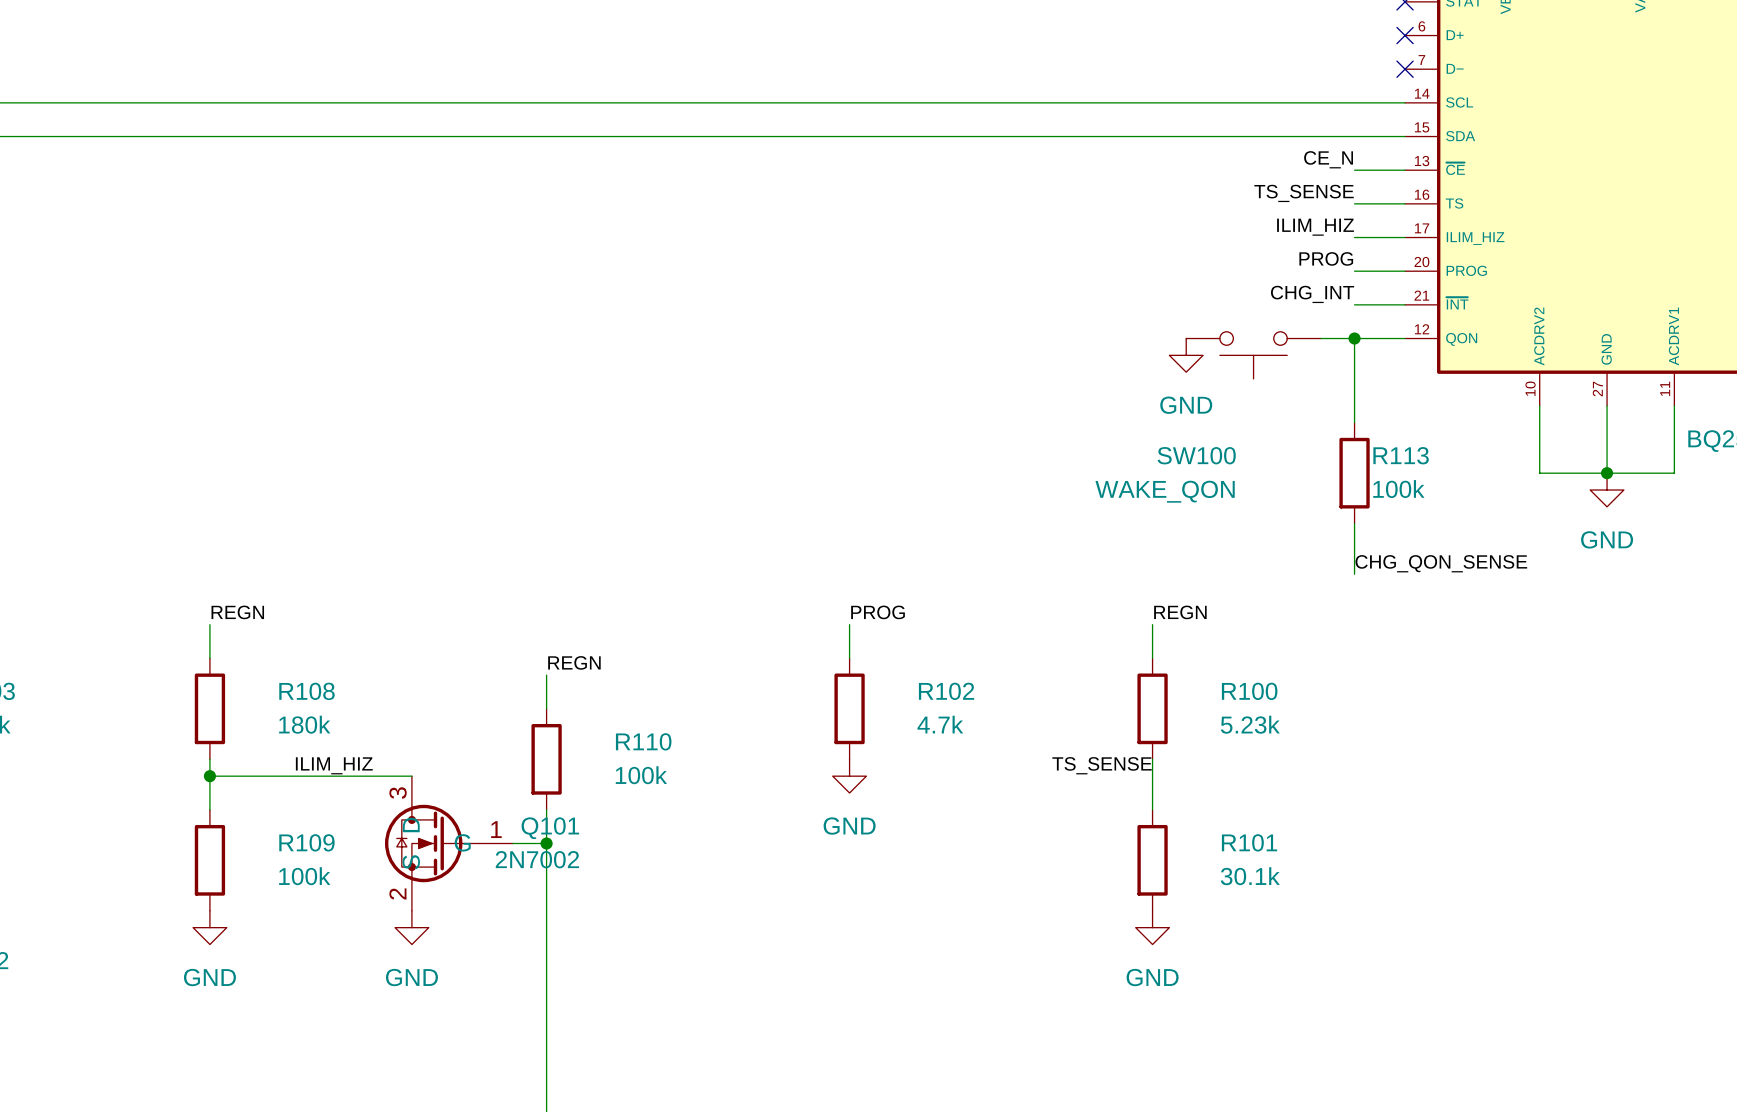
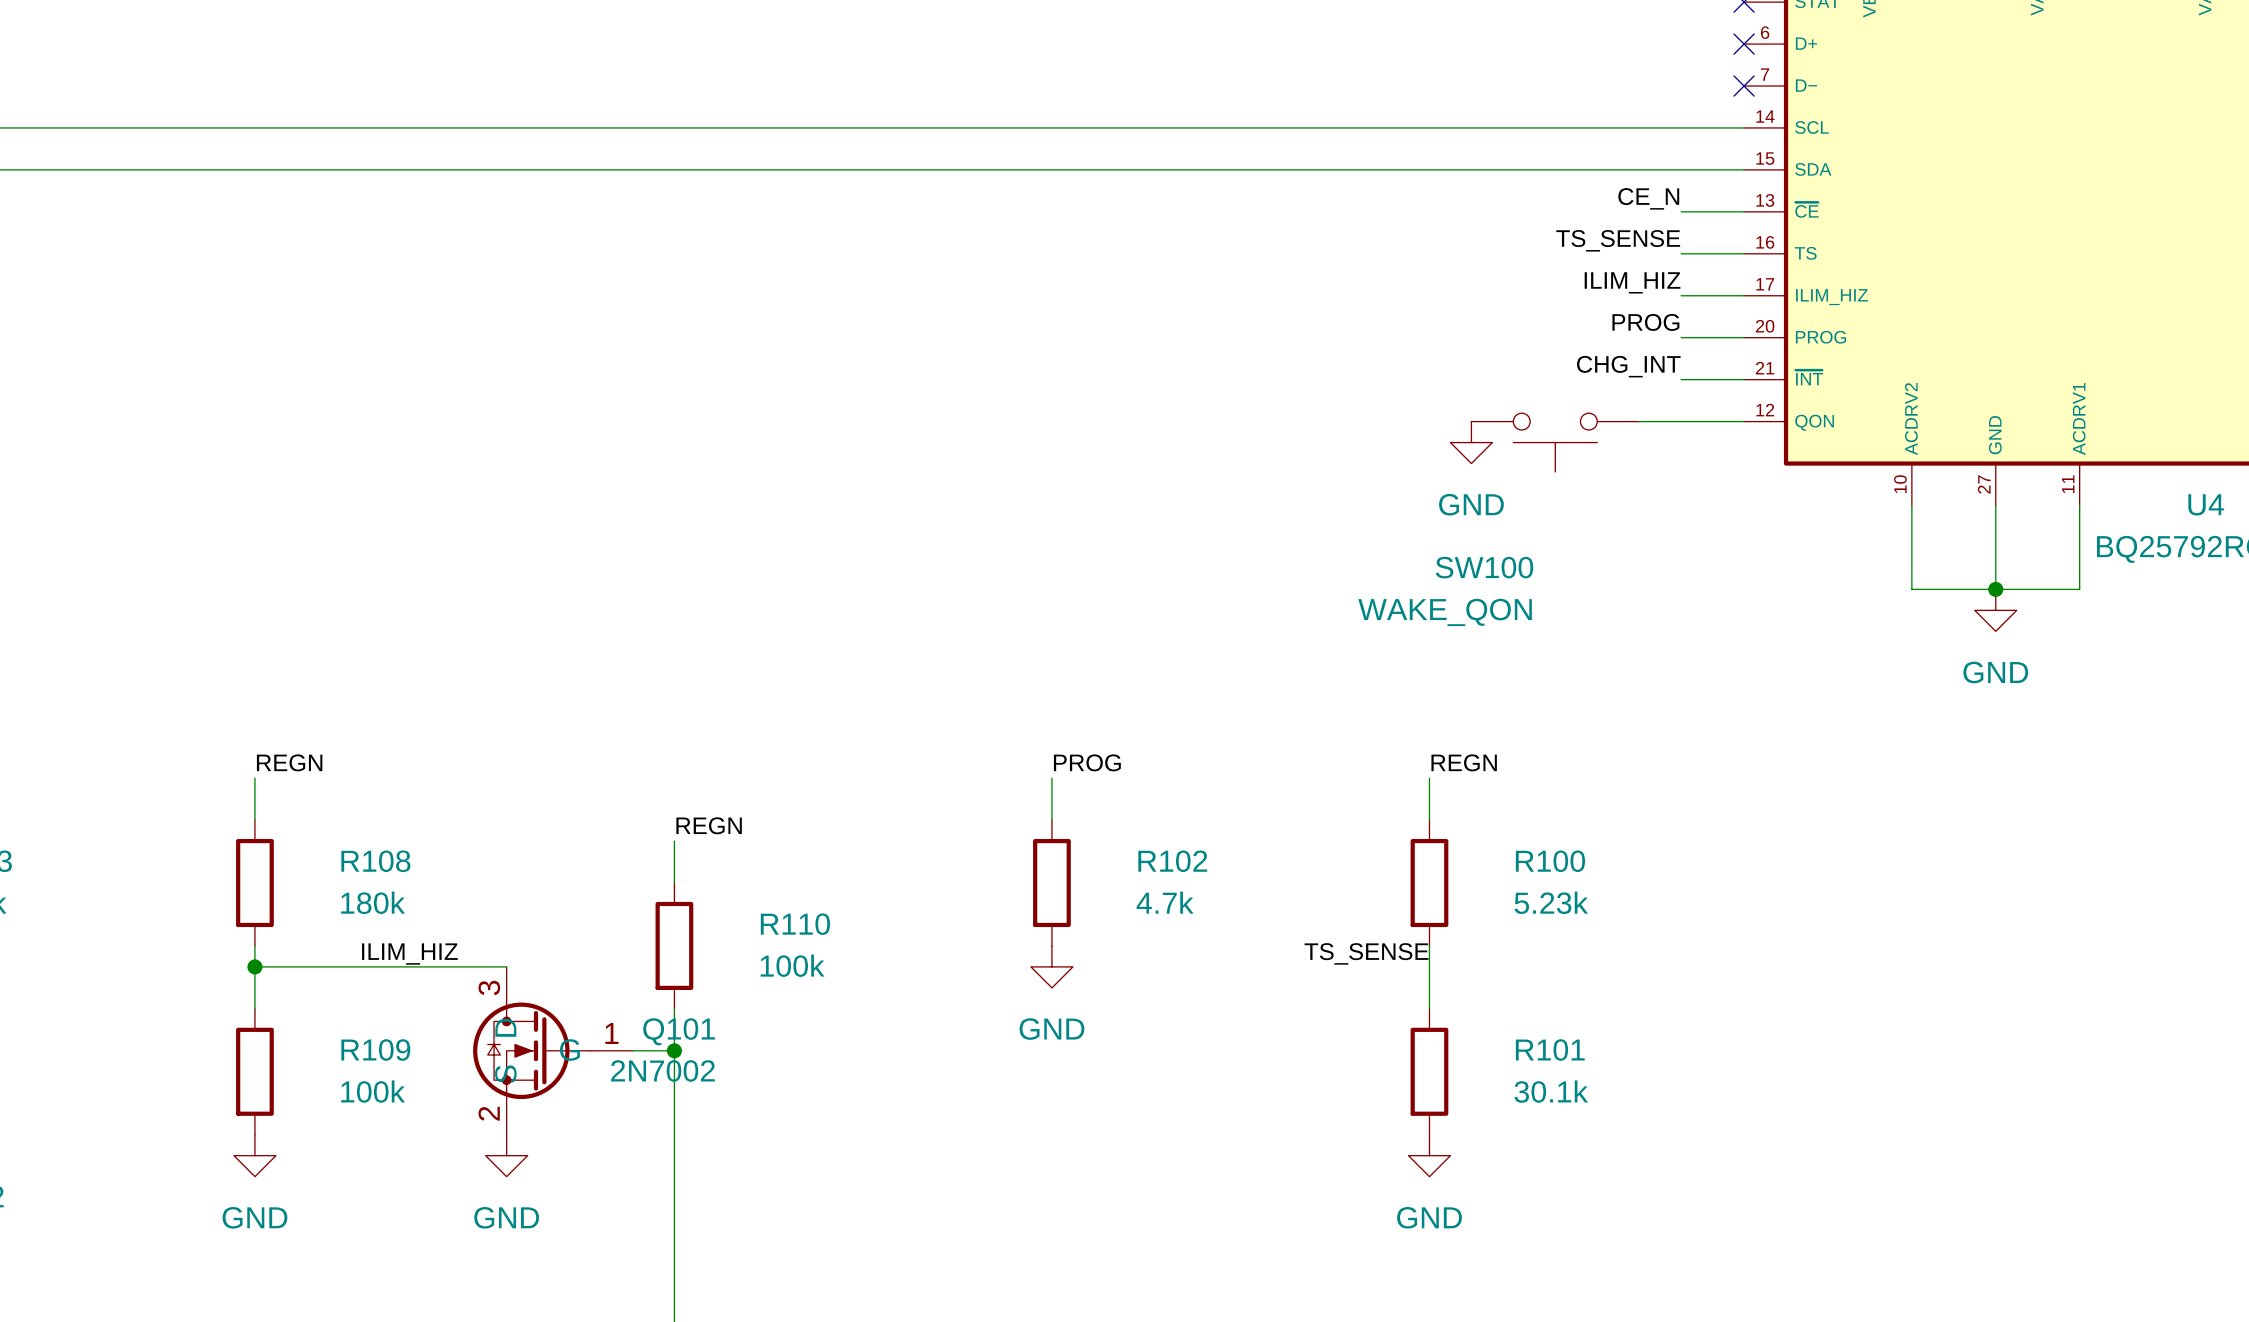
wire: (1354, 338) (1354, 422) -> none
junction: (1354, 338) -> none
R113: 100k (1354, 473) -> none
wire: (1354, 523) (1354, 574) -> none
label: CHG_QON_SENSE (1441, 563) -> none

